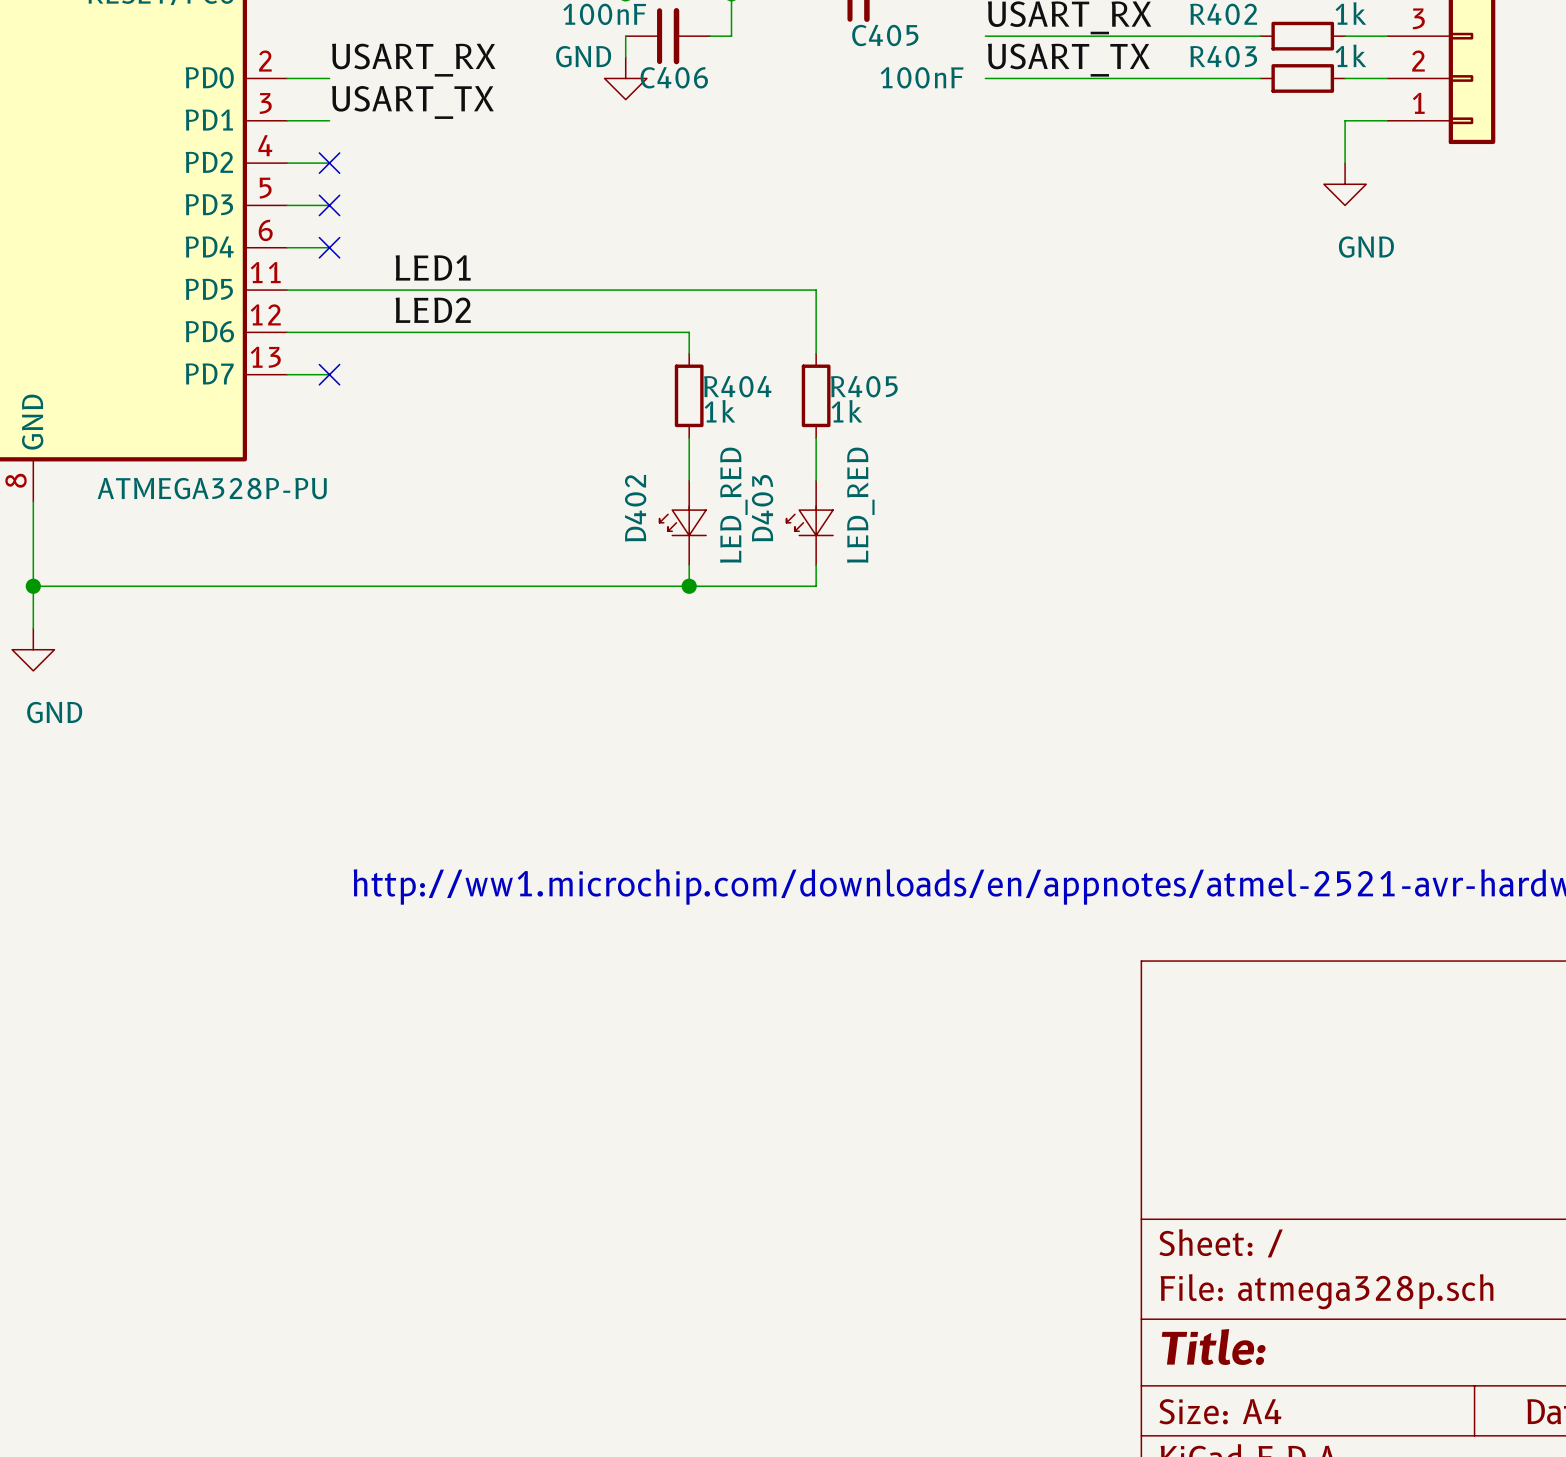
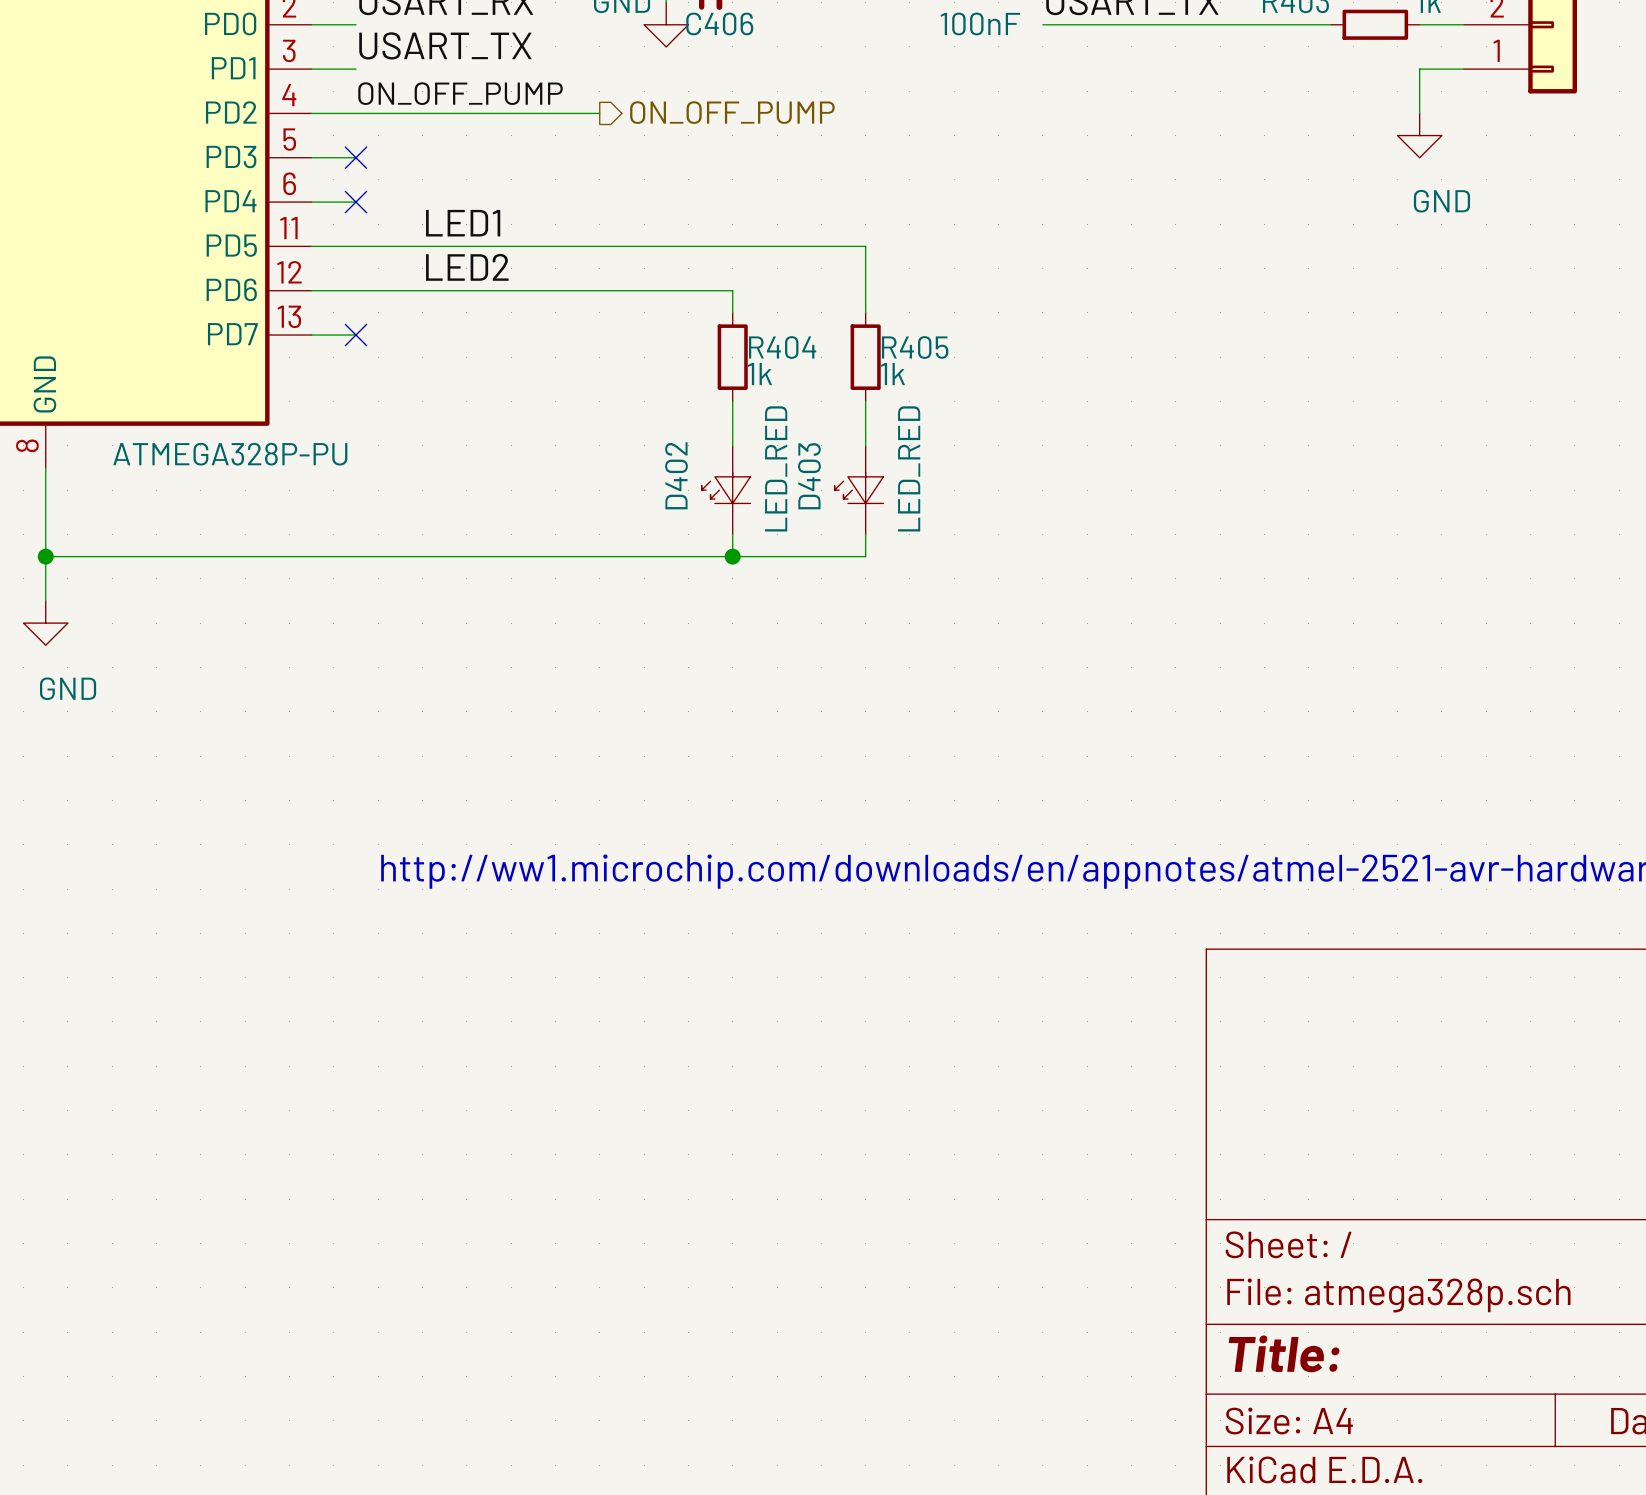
label: none -> ON_OFF_PUMP (460, 93)
wire: none -> (355, 113) (599, 113)
no-connect mark: (329, 163) -> none
hierarchical label: none -> ON_OFF_PUMP (732, 112)

